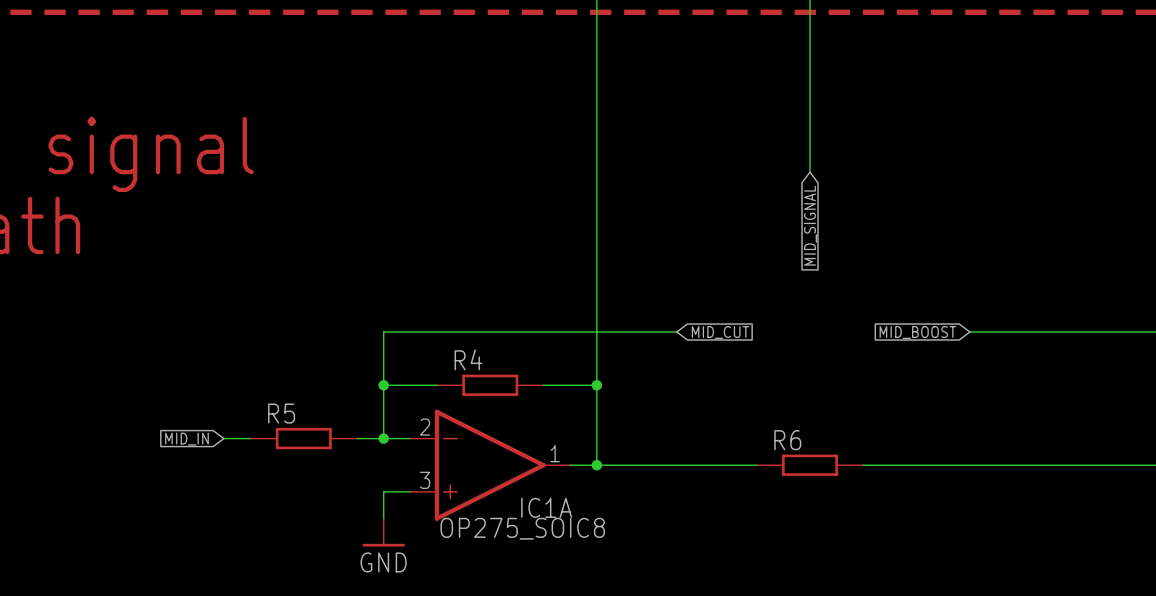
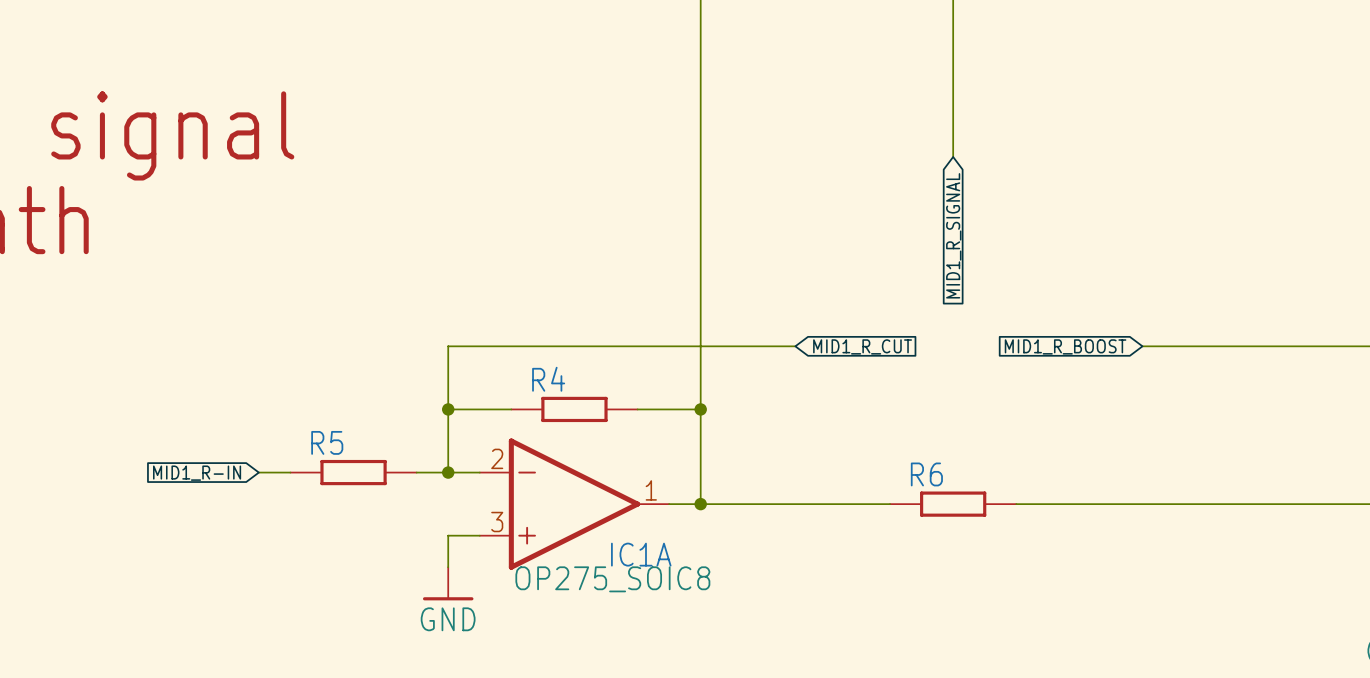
global label: MID_SIGNAL (810, 225) -> MID1_R_SIGNAL (953, 235)
global label: MID_CUT (720, 332) -> MID1_R_CUT (862, 346)
global label: MID_BOOST (917, 332) -> MID1_R_BOOST (1065, 346)
global label: MID_IN (186, 439) -> MID1_R-IN (197, 473)

